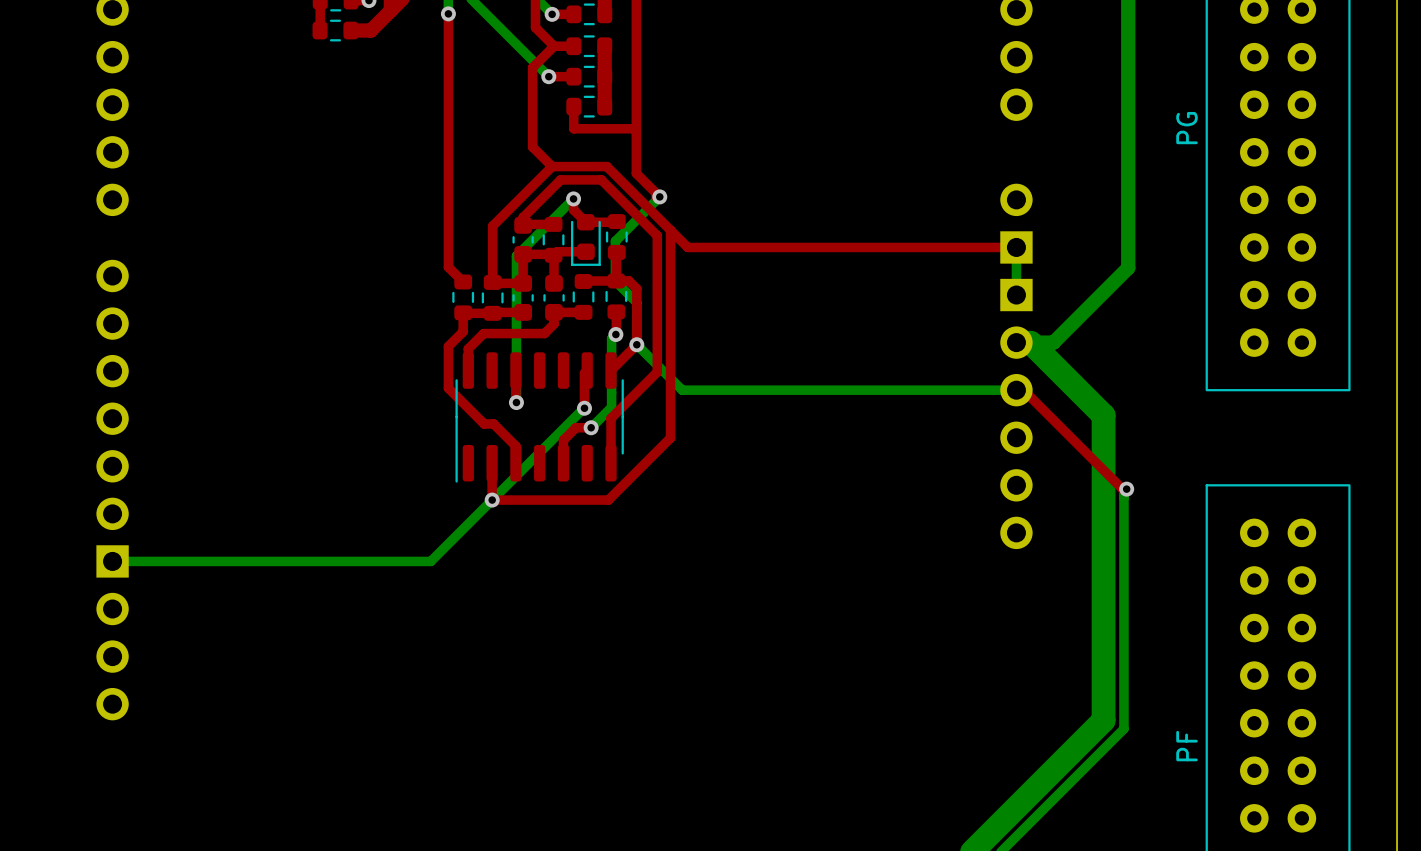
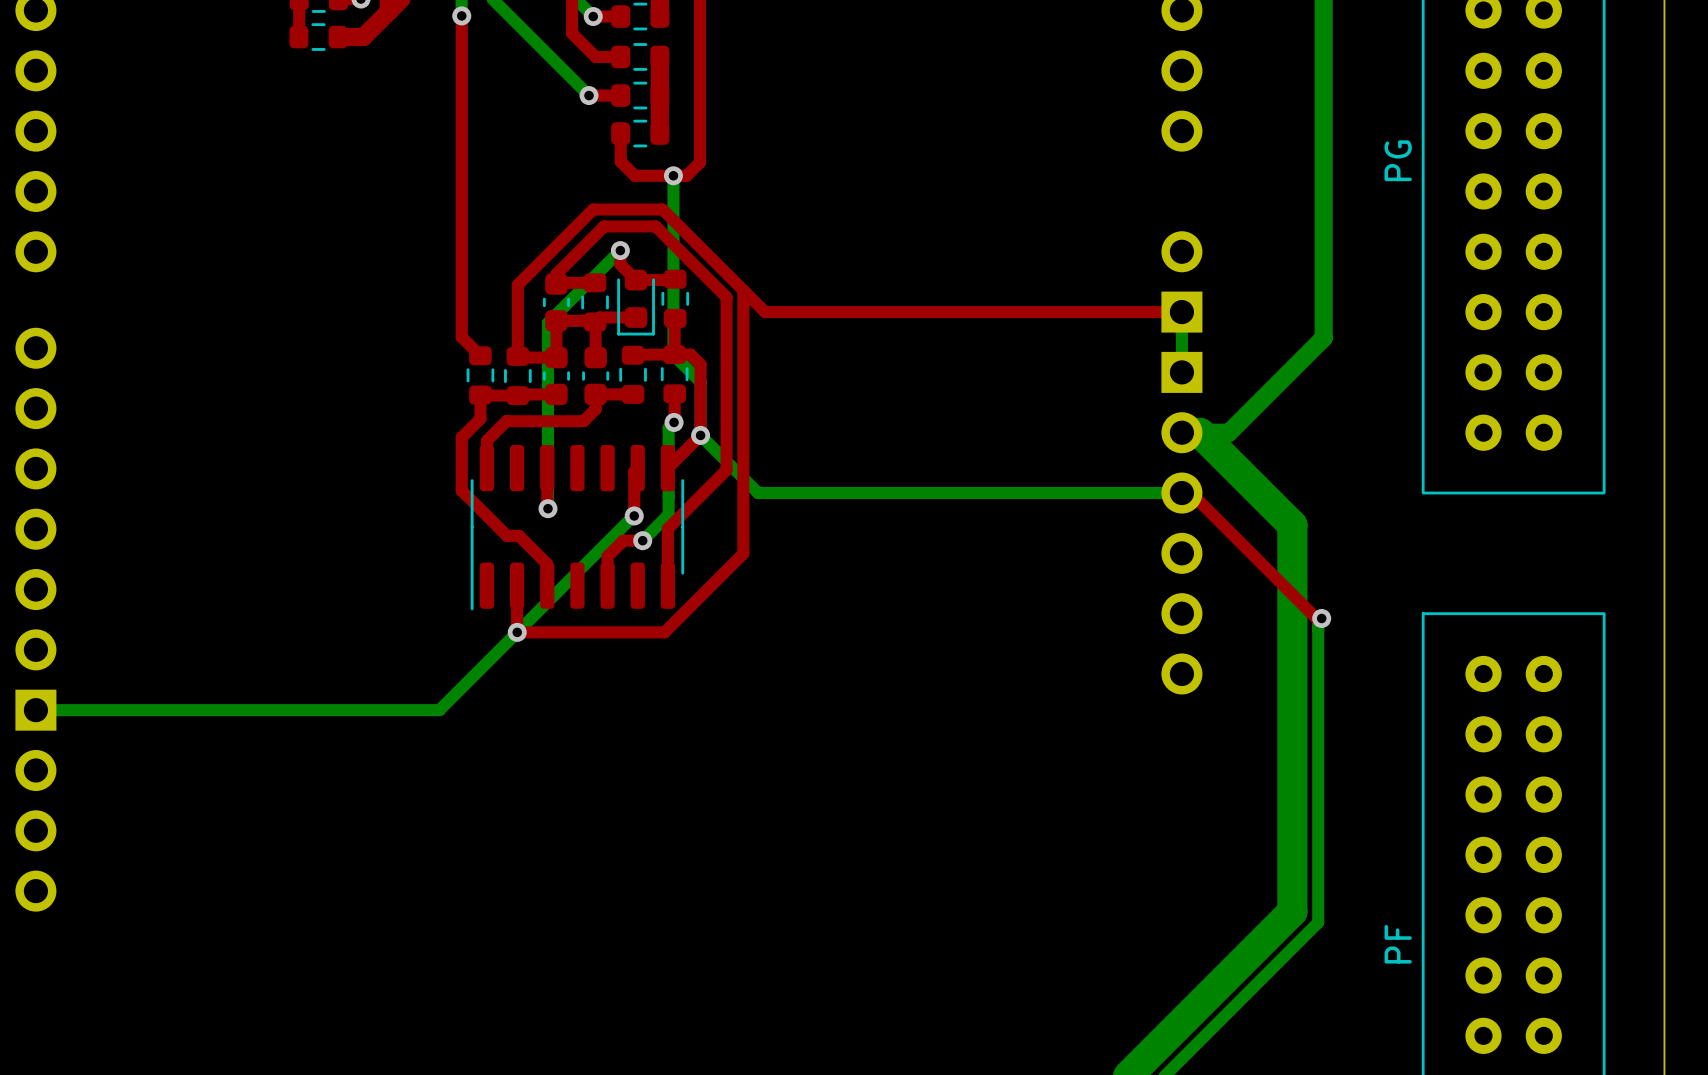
top track: (554, 46) (532, 67) (532, 147) (552, 166) -> none
top track: (573, 128) (635, 128) (636, 173) (659, 196) (655, 196) -> (620, 161) (634, 175) (686, 175) (700, 162)
bottom track: (659, 196) (615, 241) -> (673, 175) (673, 304)
via position: (659, 196) -> (673, 175)

